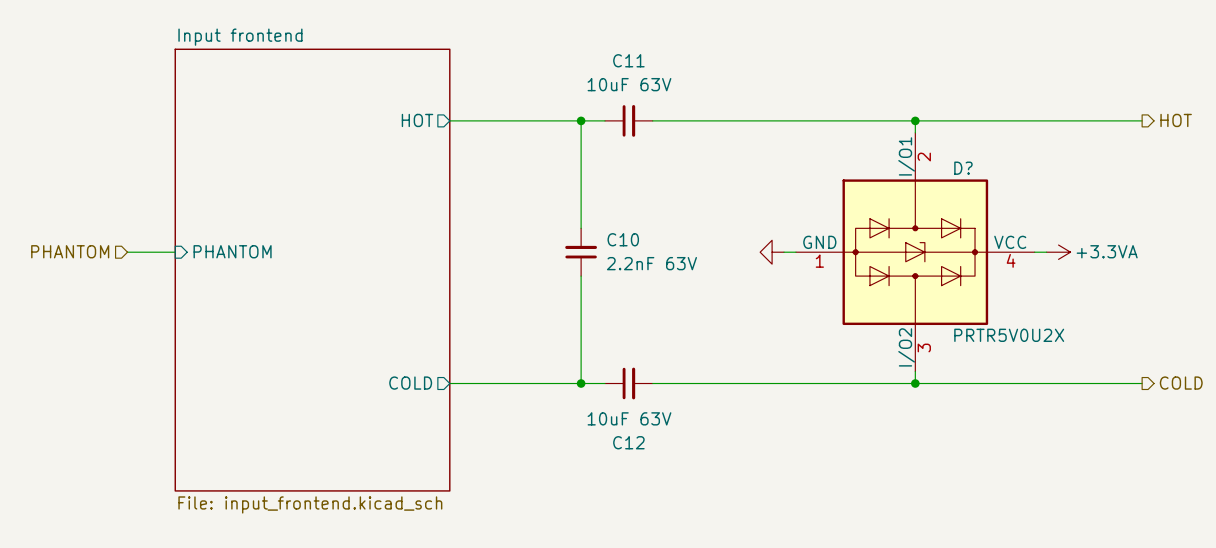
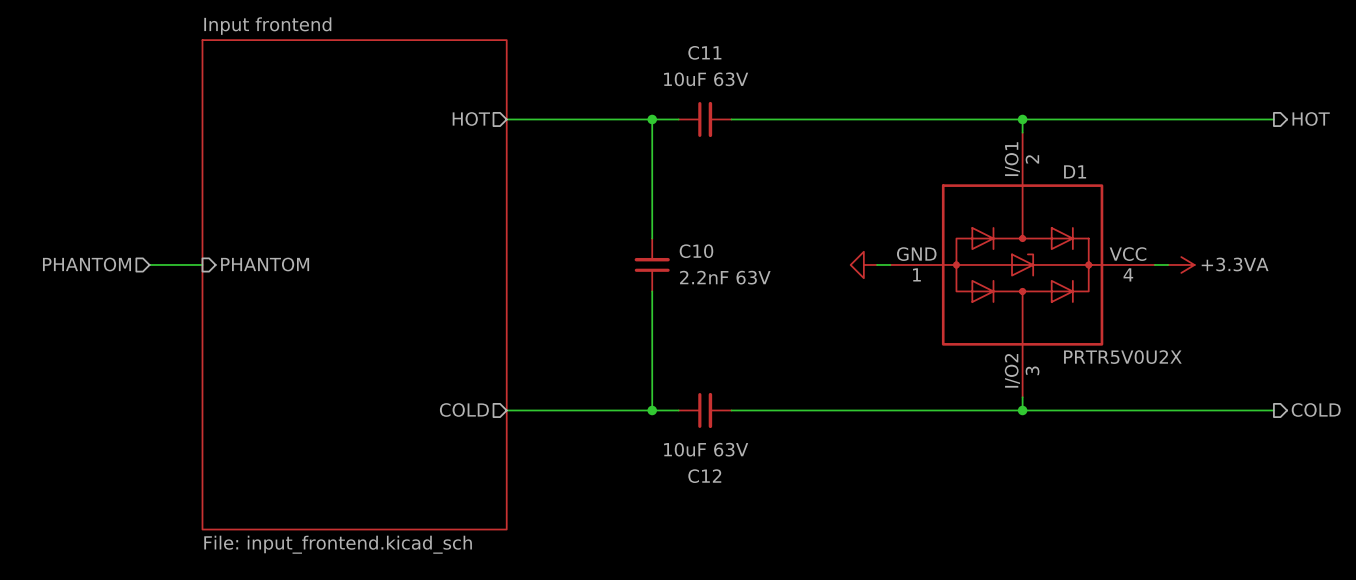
D? name: D? (963, 168) -> D1 (1075, 171)

